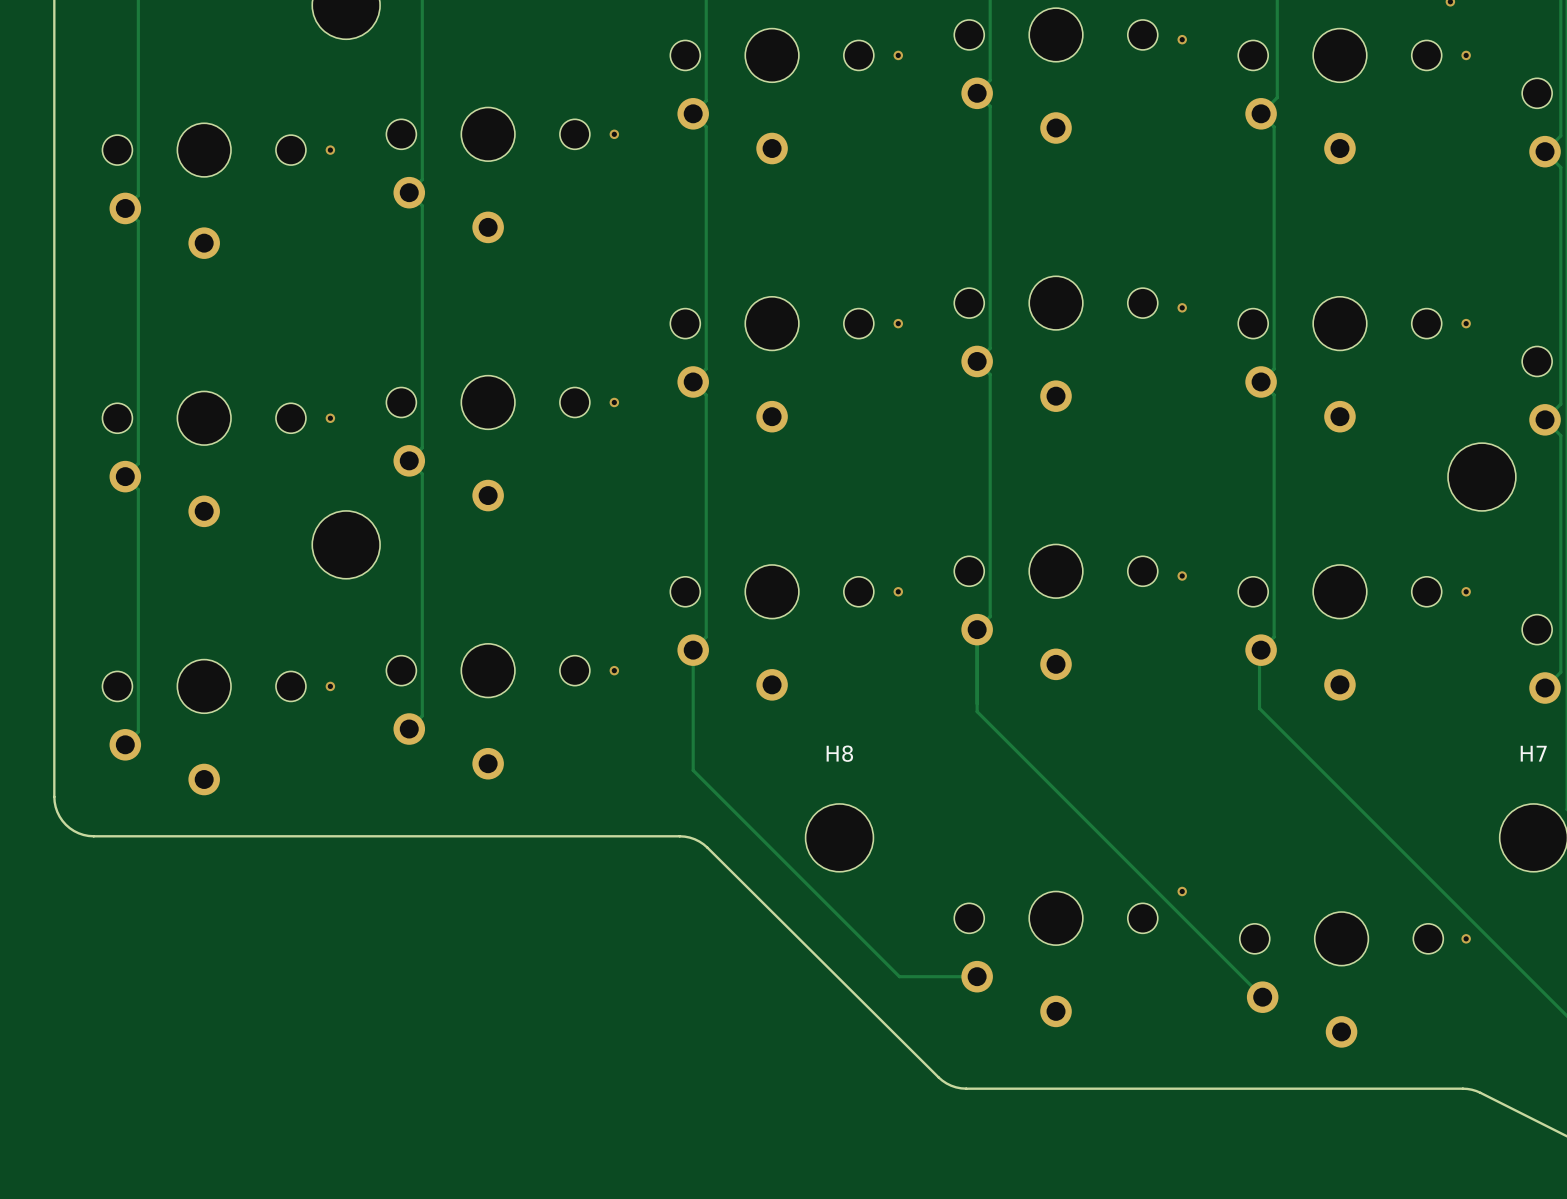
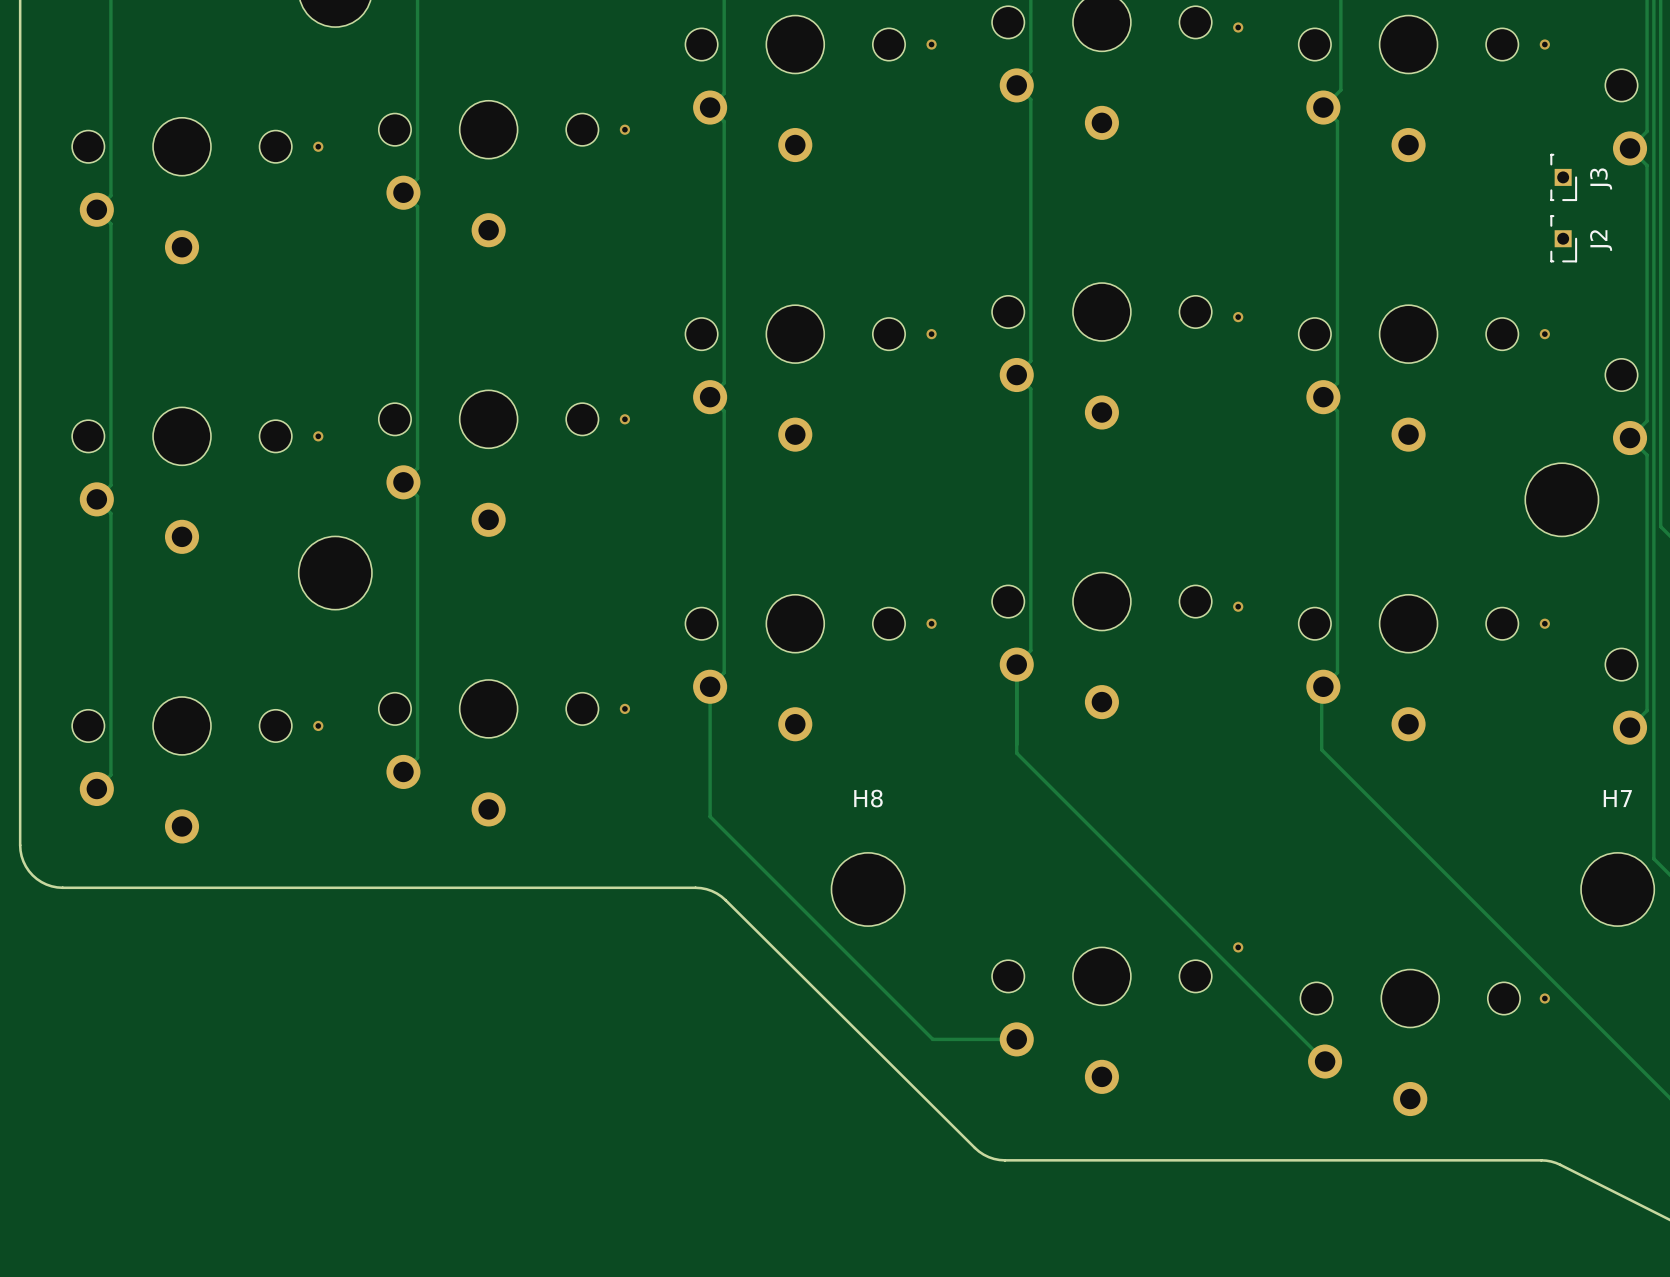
J3: none -> (1563, 177)
J2: none -> (1563, 238)

